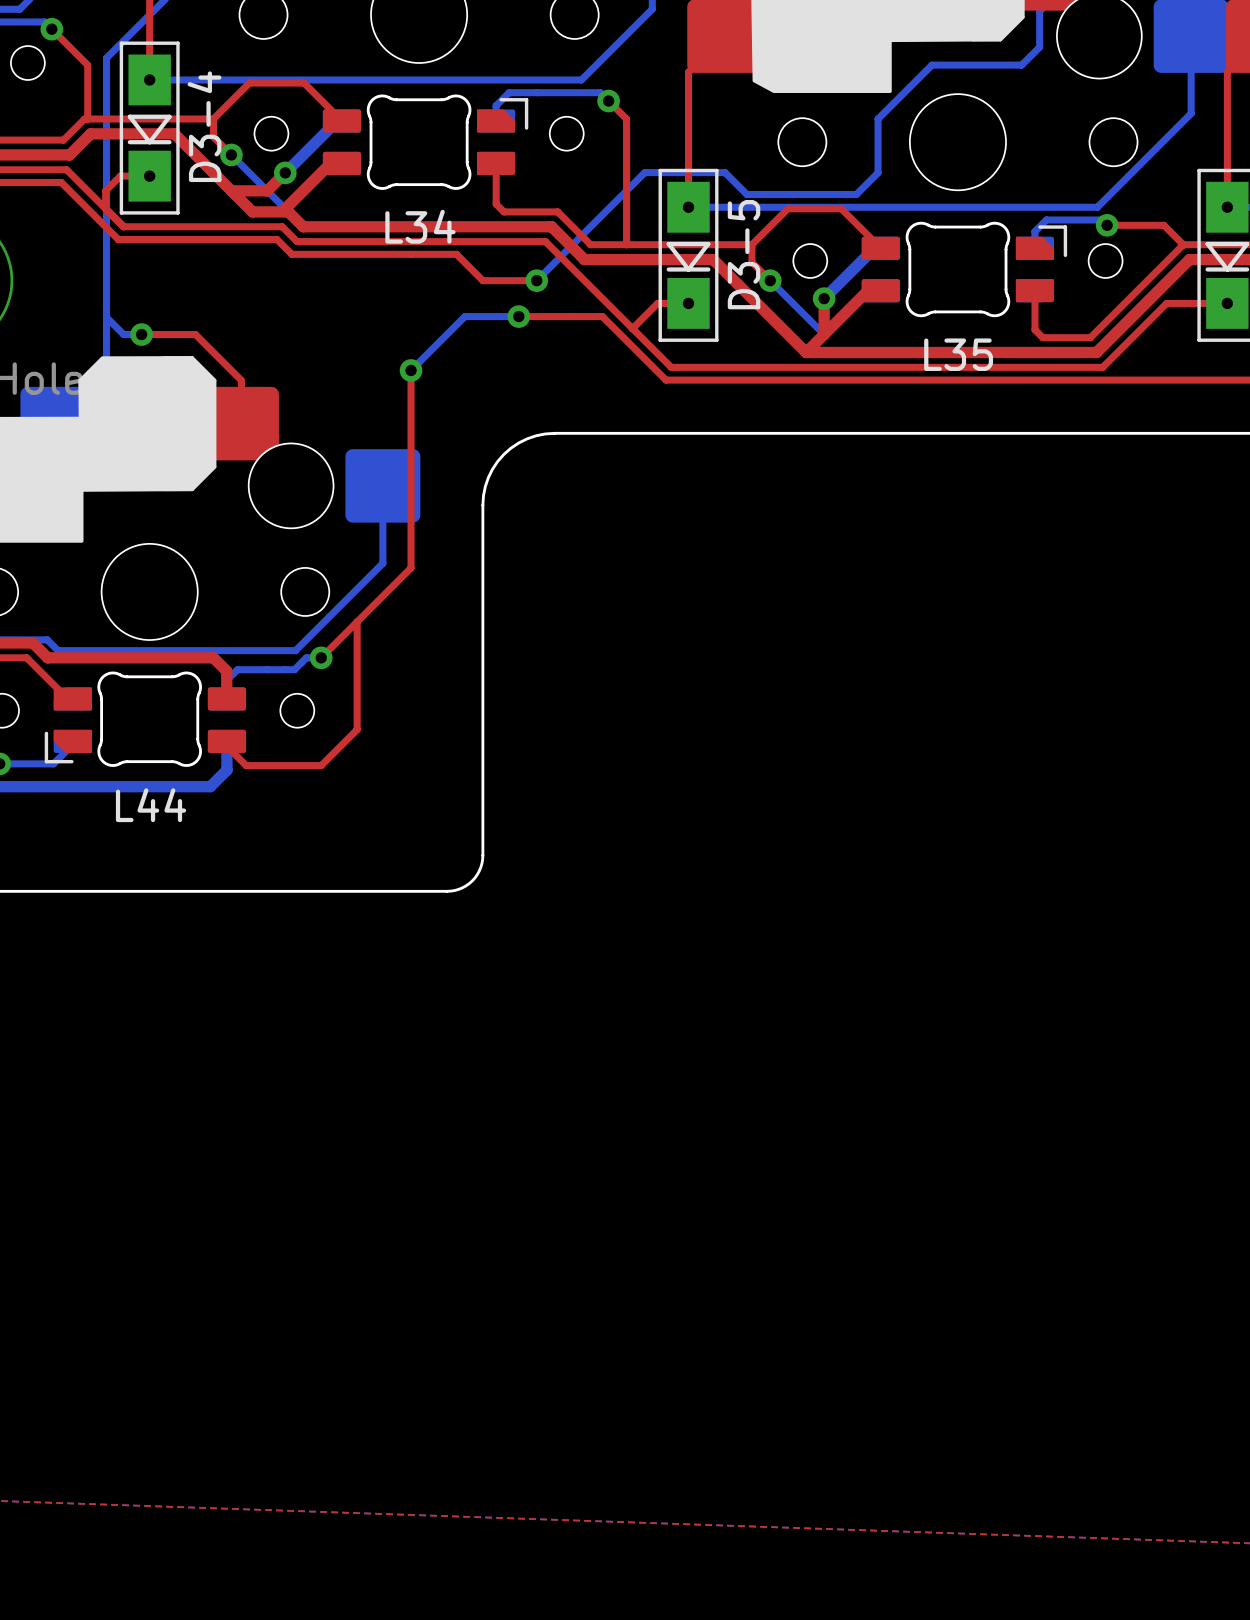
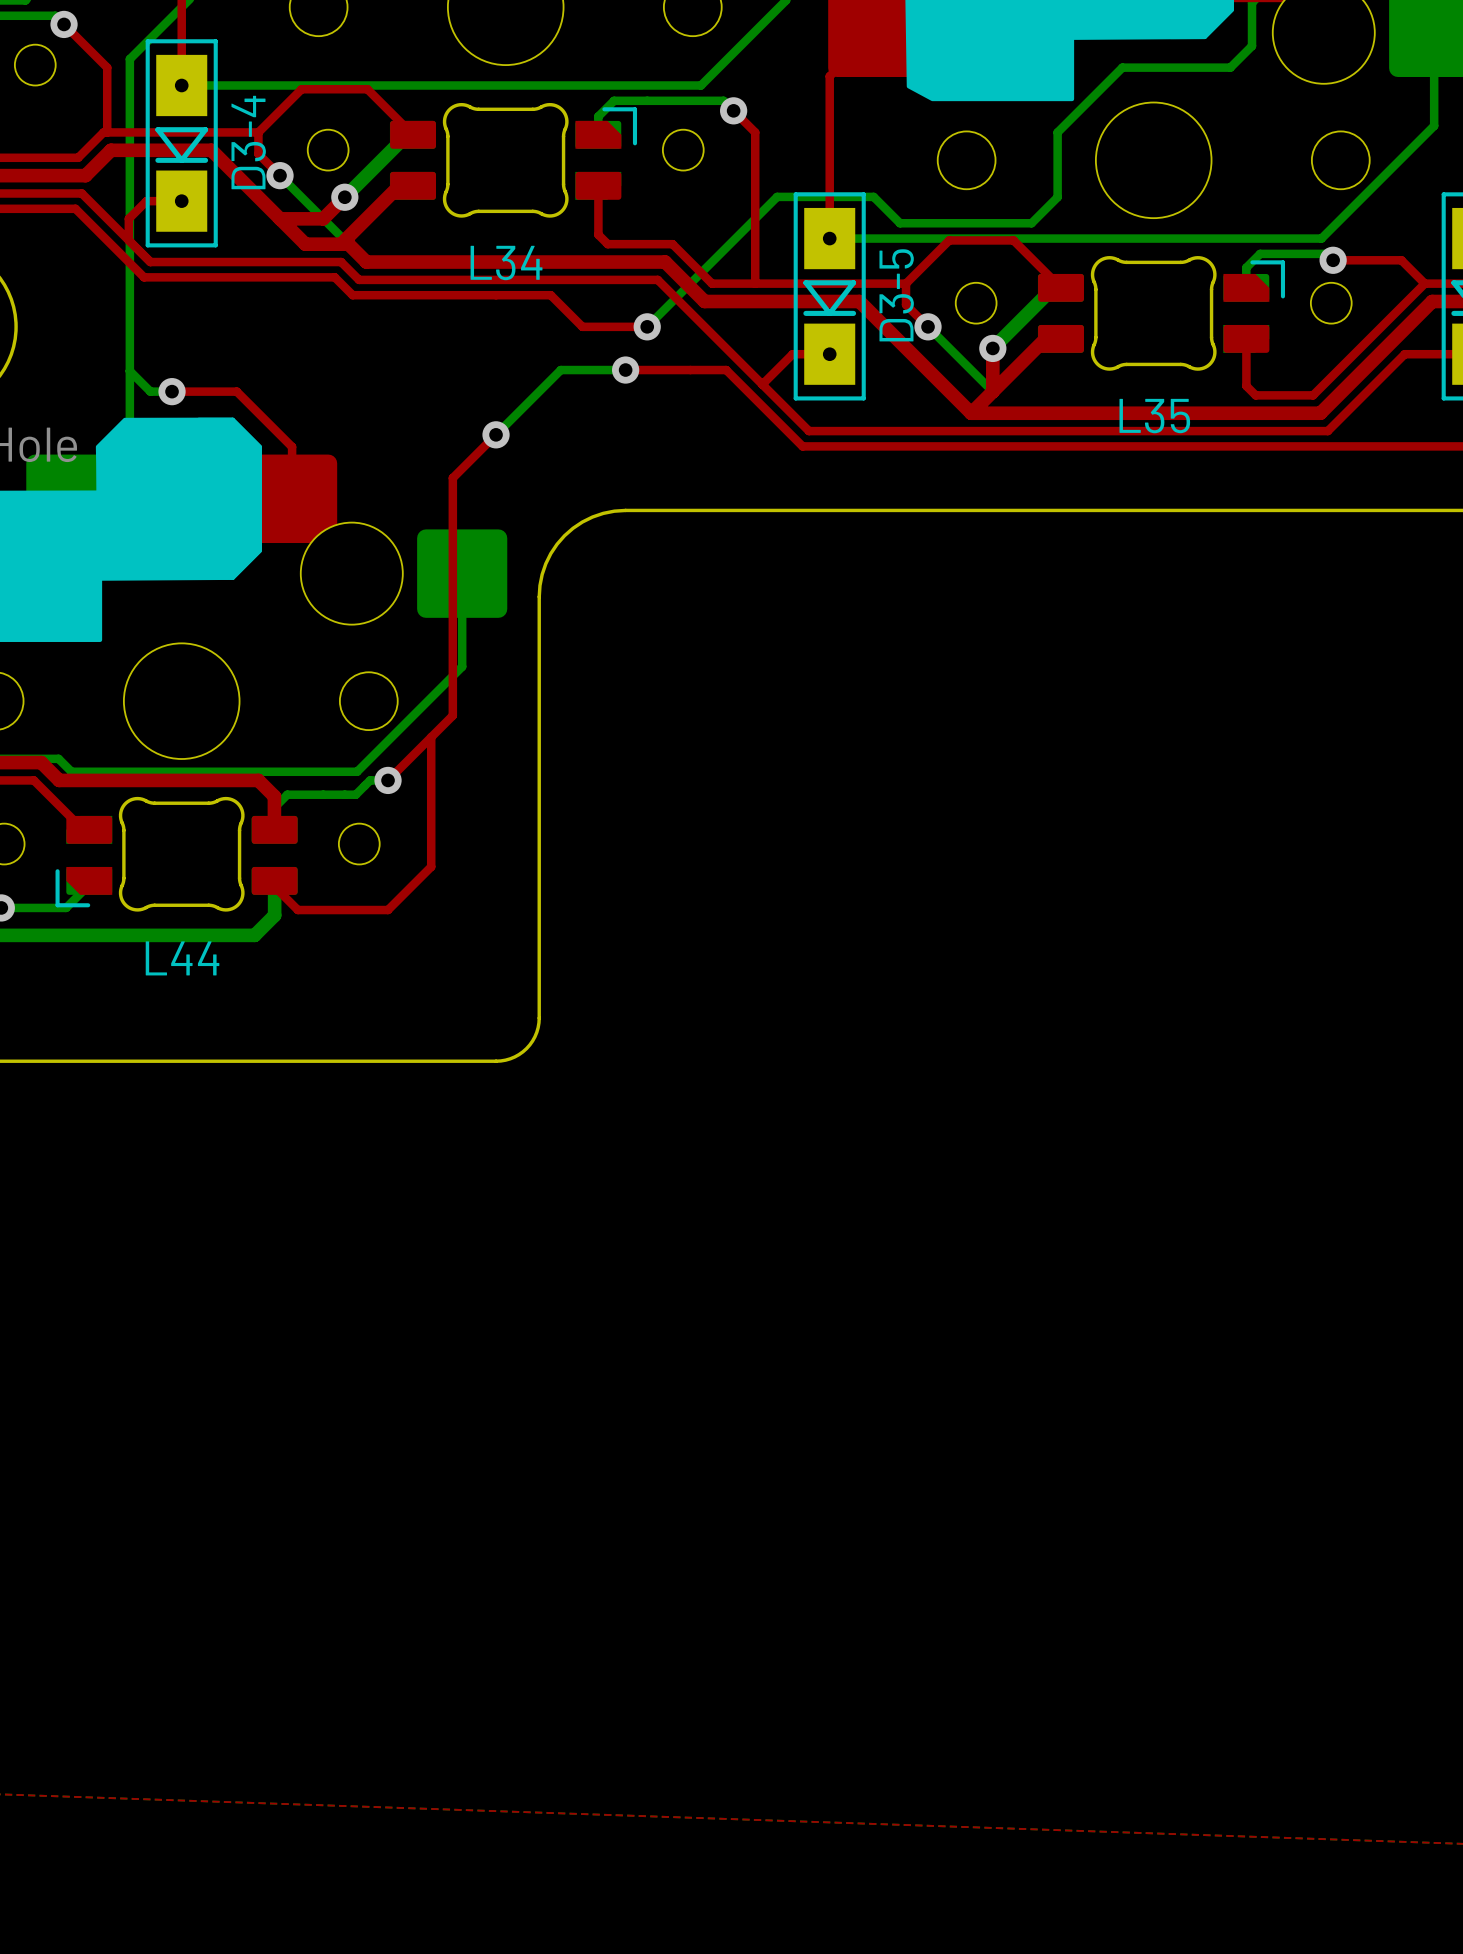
top track: (411, 370) (411, 568) (375, 603) -> (496, 434) (452, 478) (452, 715)
board edge: (554, 433) (527, 438) (503, 454) (492, 469) (483, 495) (482, 855) (480, 867) (472, 880) (458, 889) (446, 891) (411, 891) -> (668, 510) (614, 511) (582, 522) (557, 544) (542, 574) (539, 596) (538, 1022) (534, 1036) (526, 1048) (514, 1056) (496, 1061)

